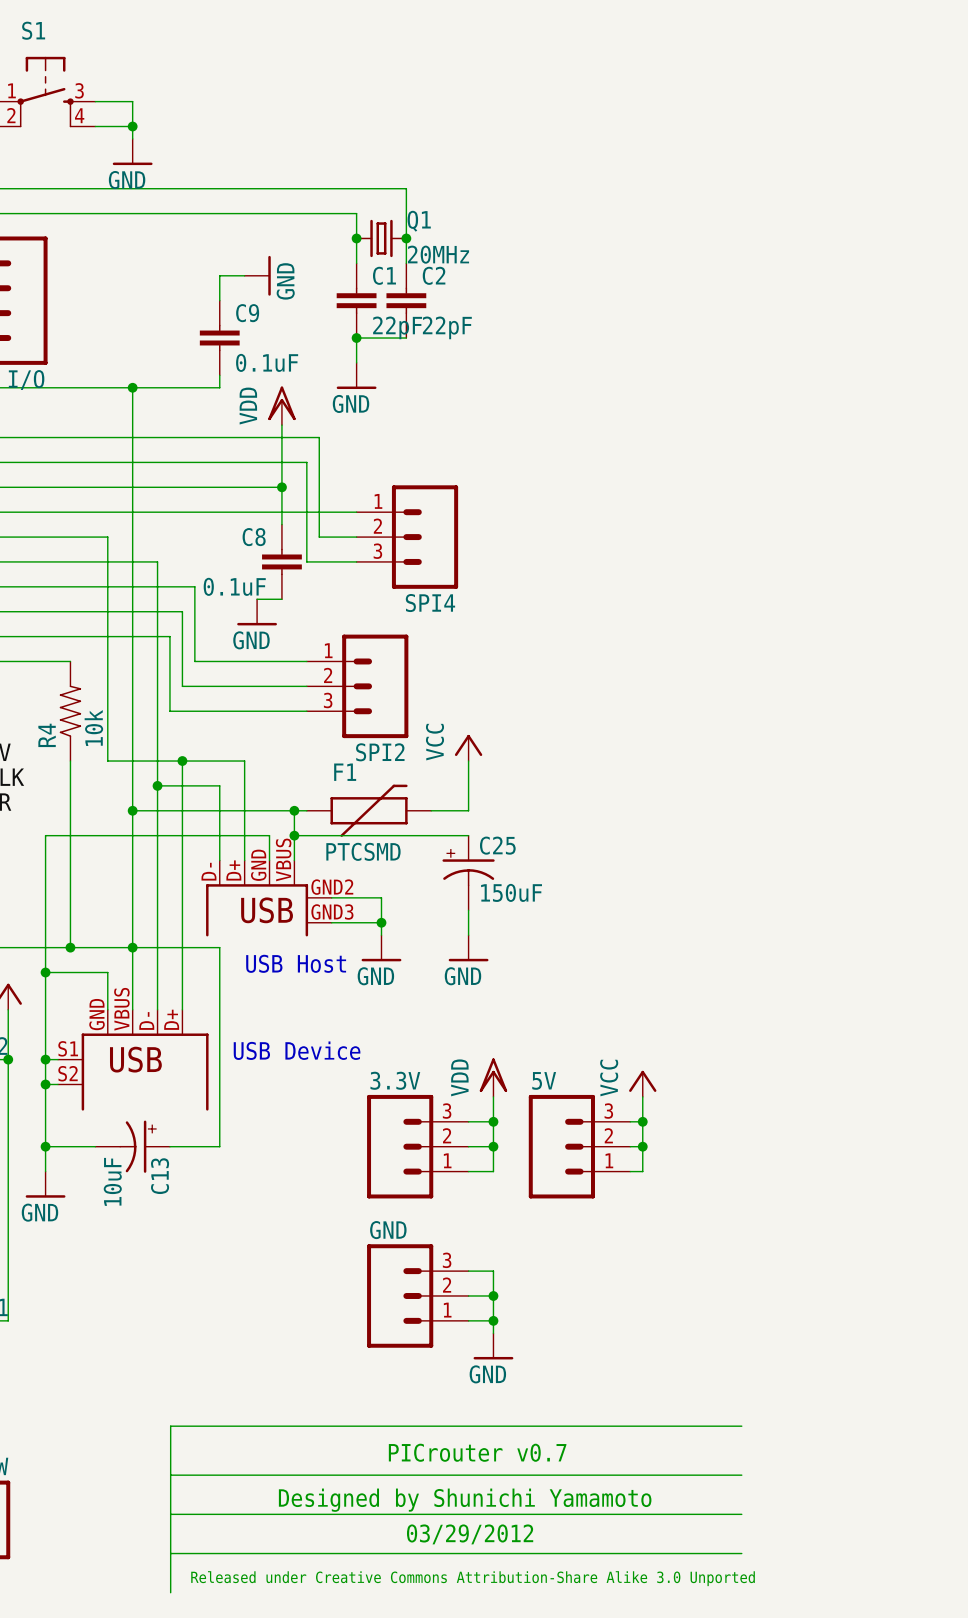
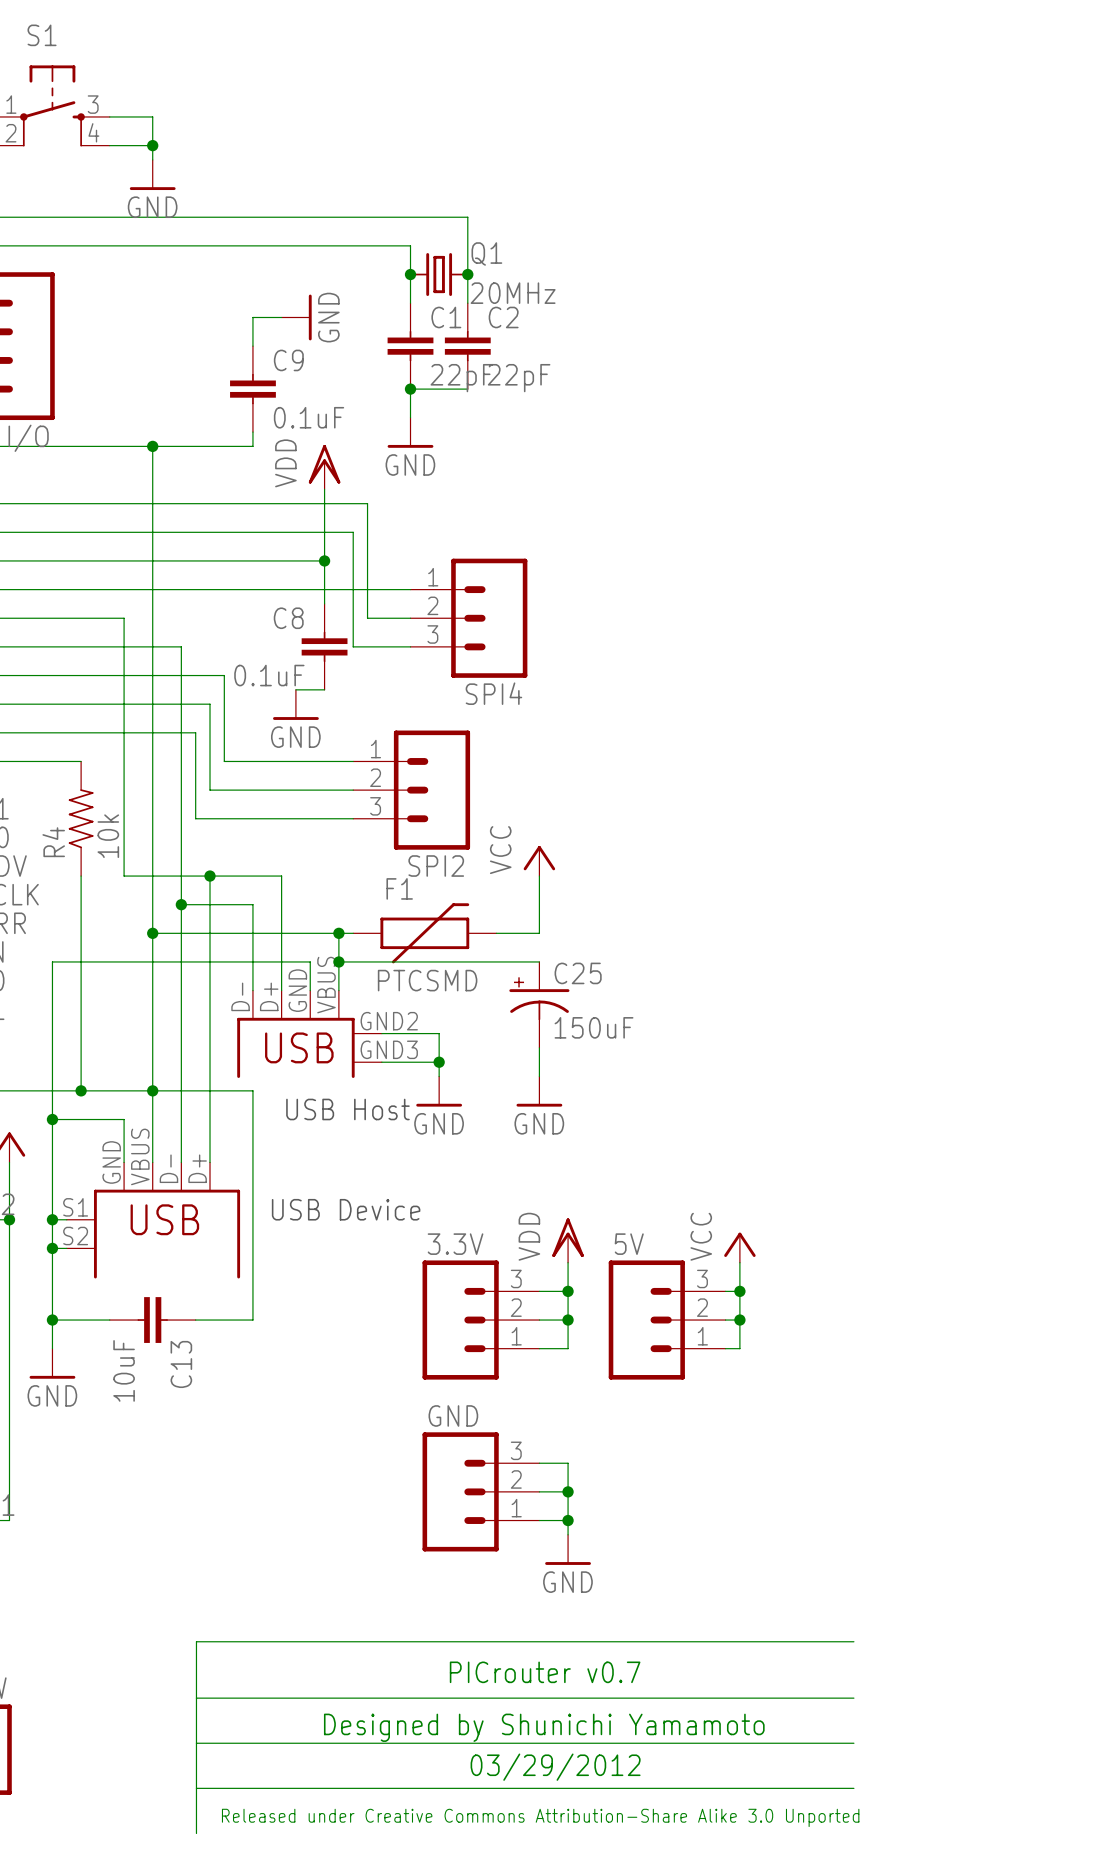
C13 symbol: [95, 1120, 170, 1173] -> [109, 1297, 196, 1343]

